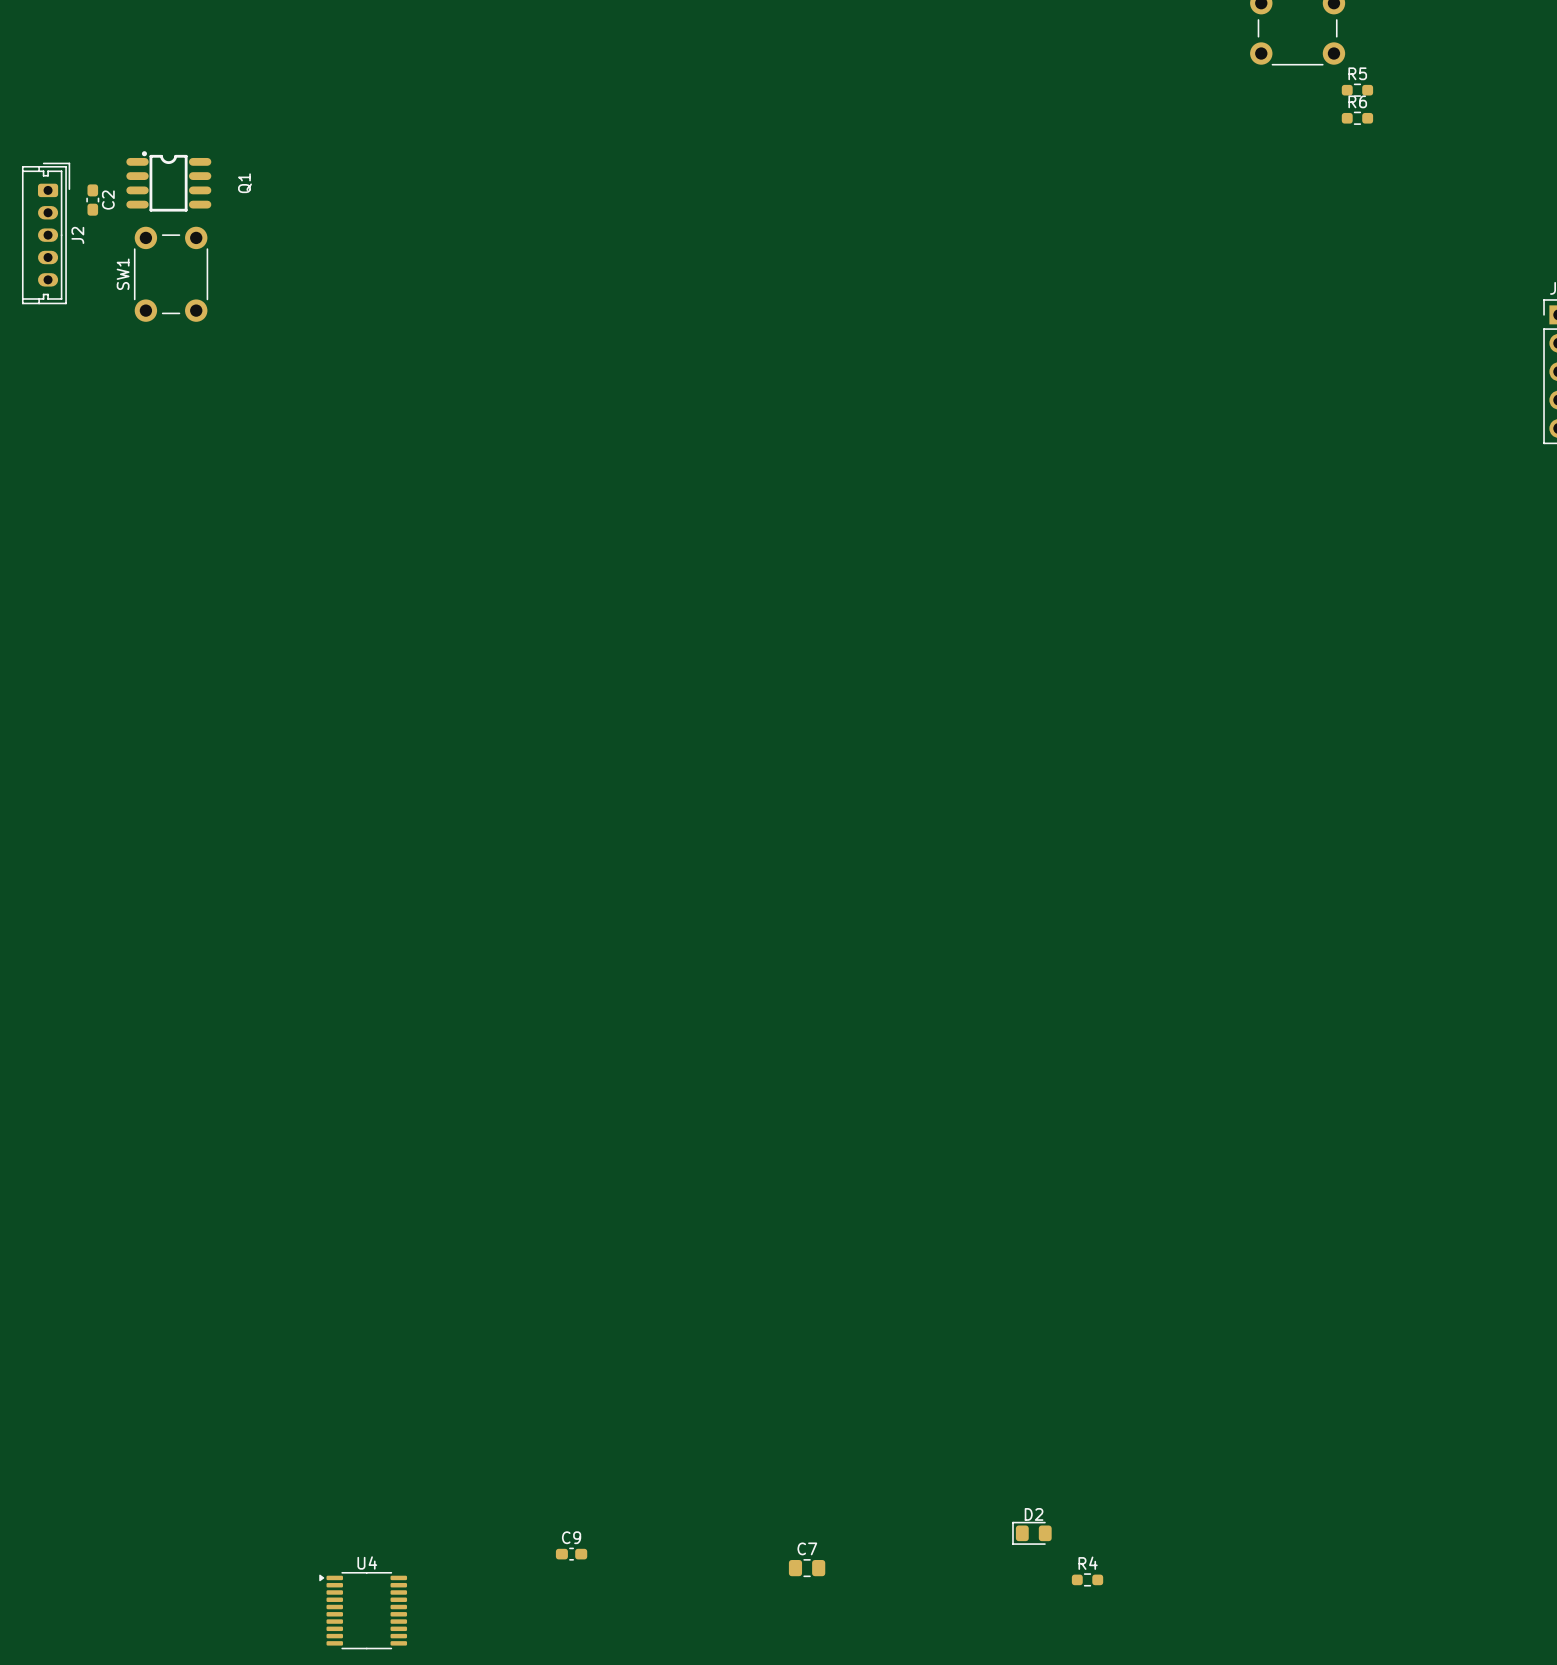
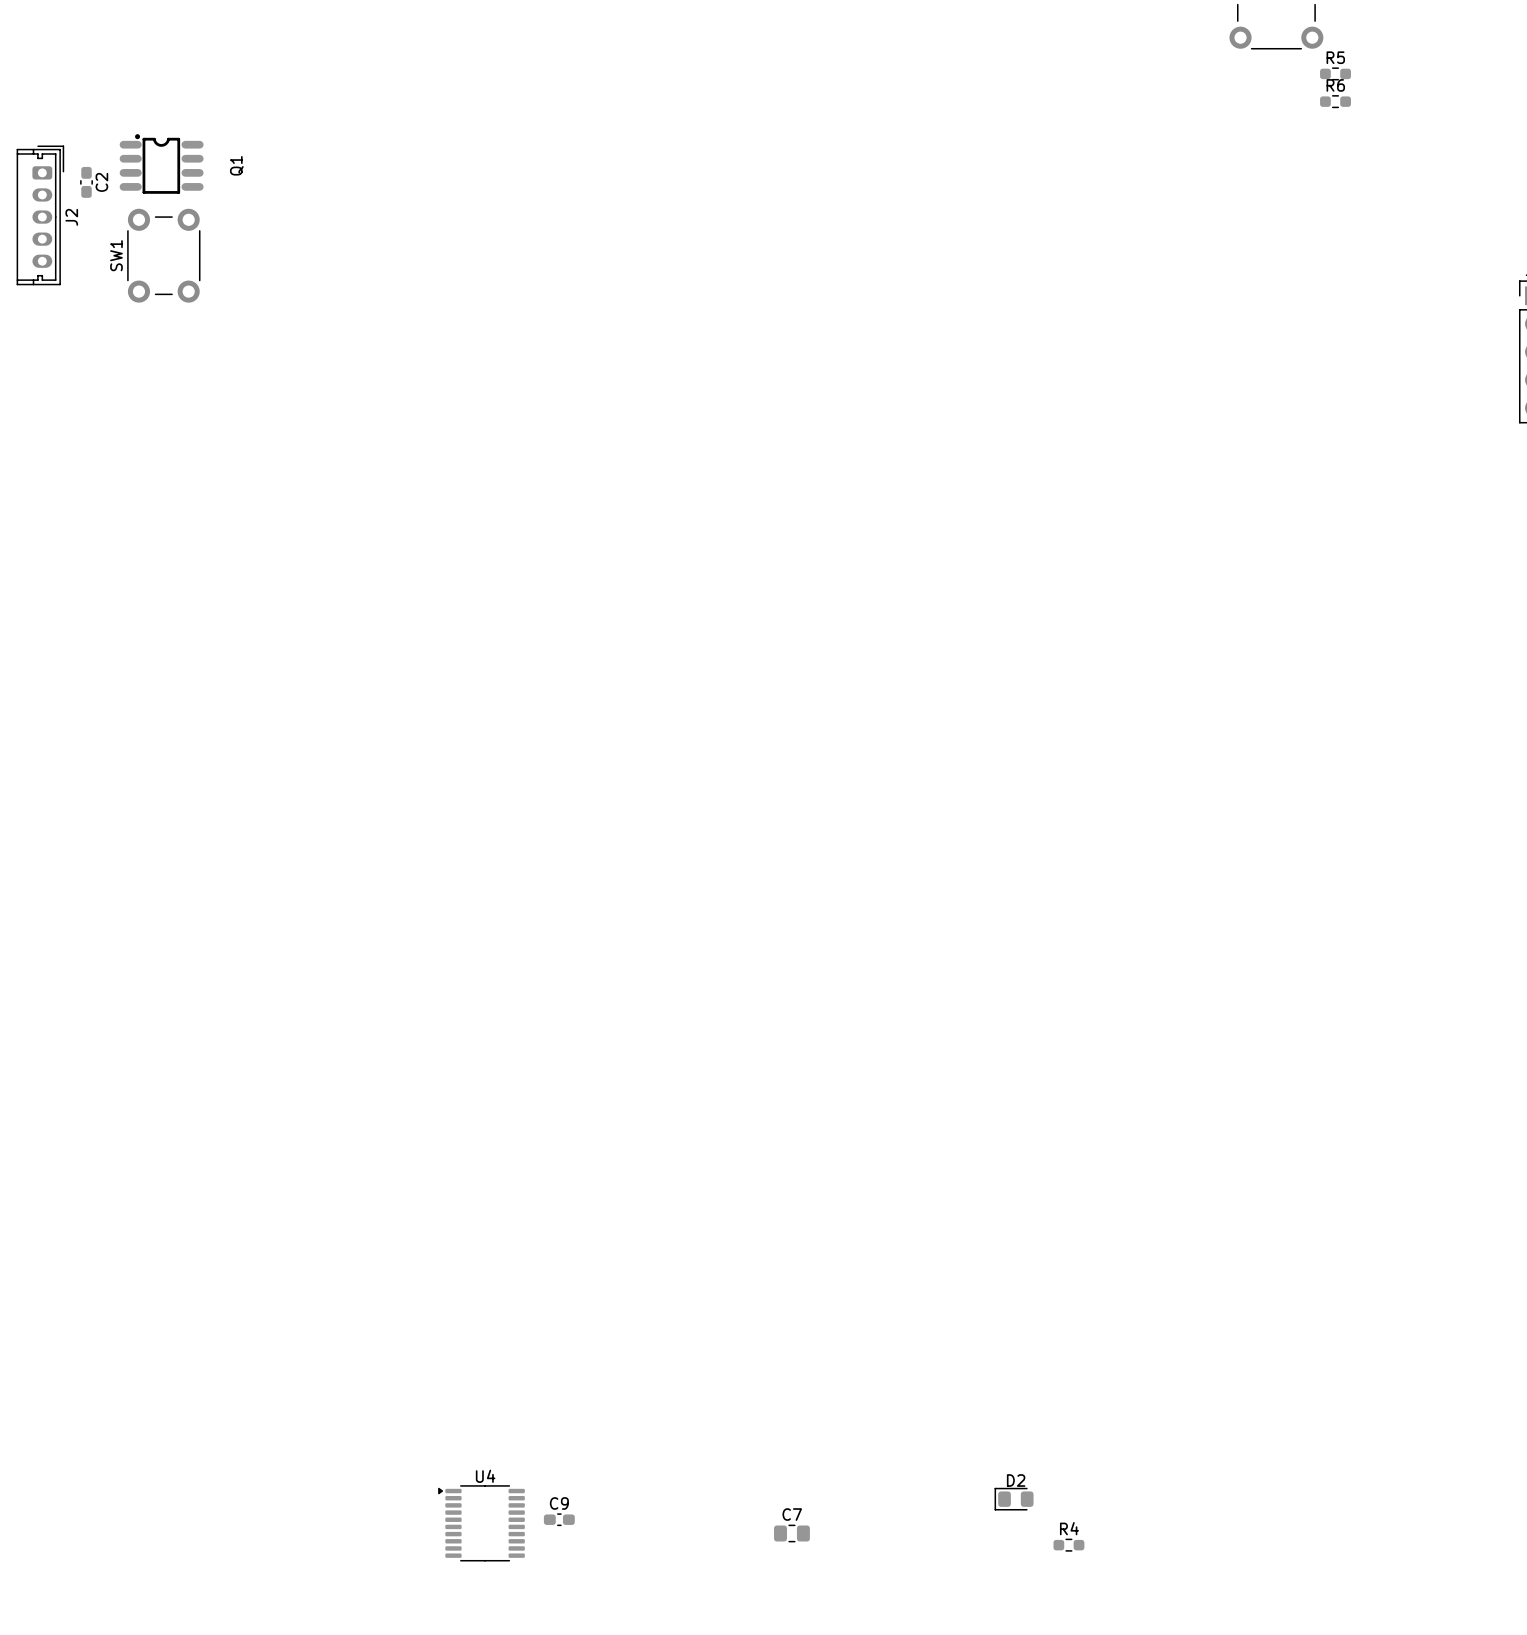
U4 position: (363, 1610) -> (481, 1523)

